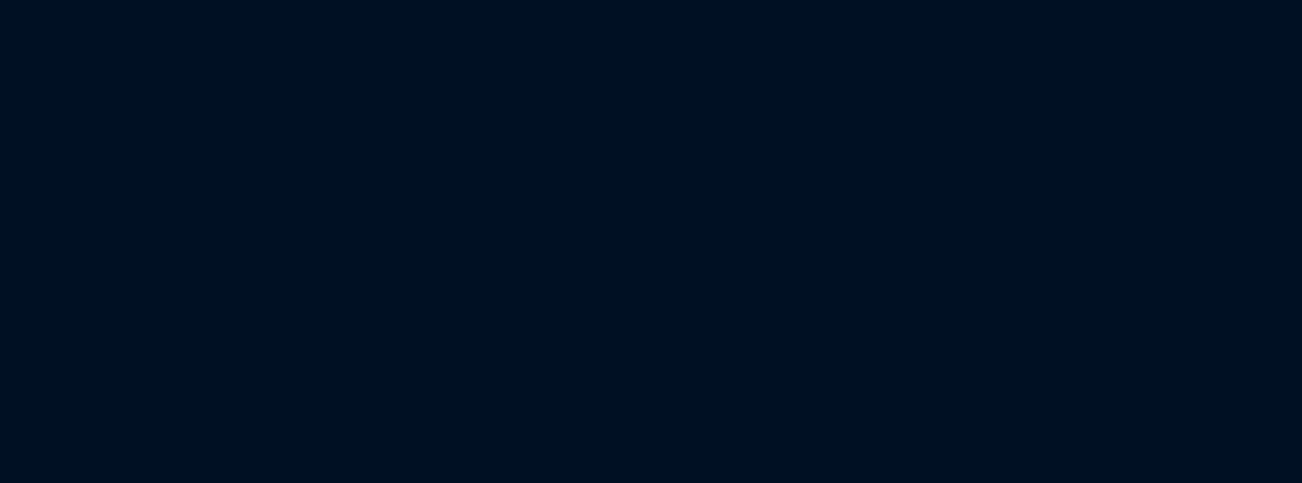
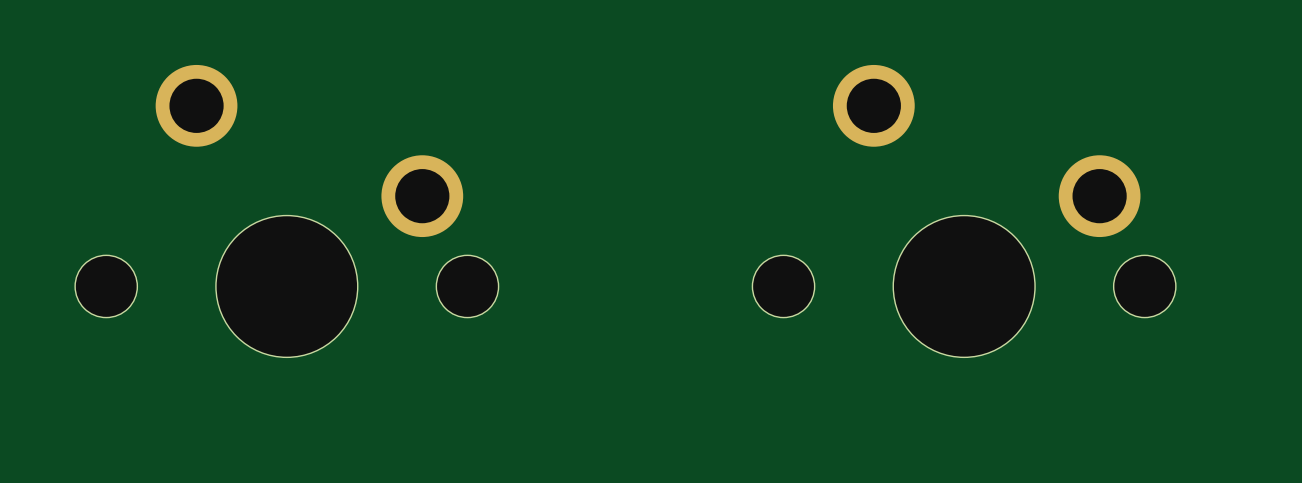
part: none -> (286, 211)
part: none -> (964, 211)

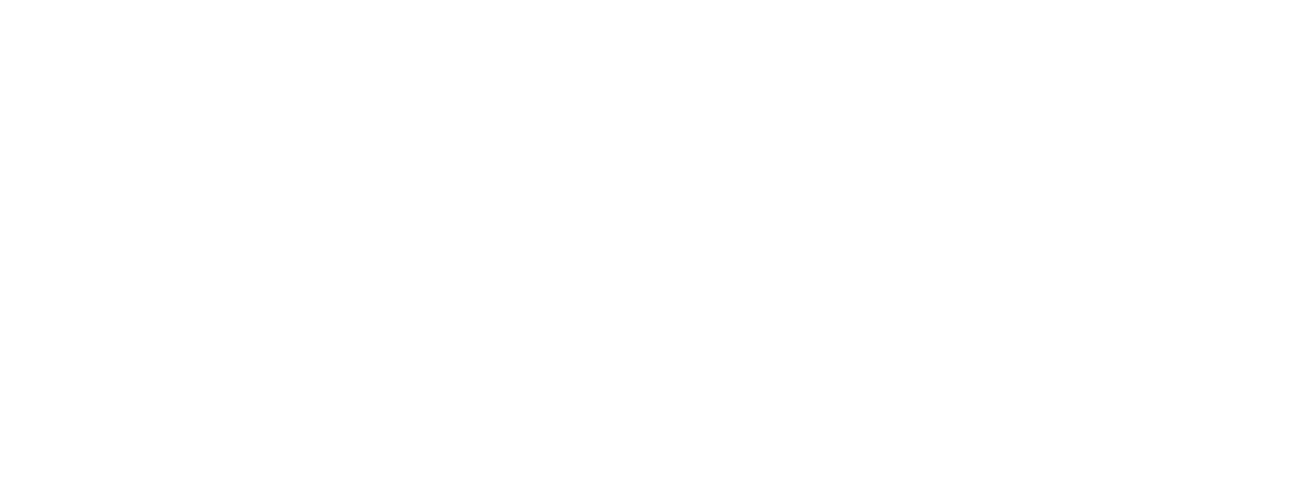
part: (286, 211) -> none
part: (964, 211) -> none

